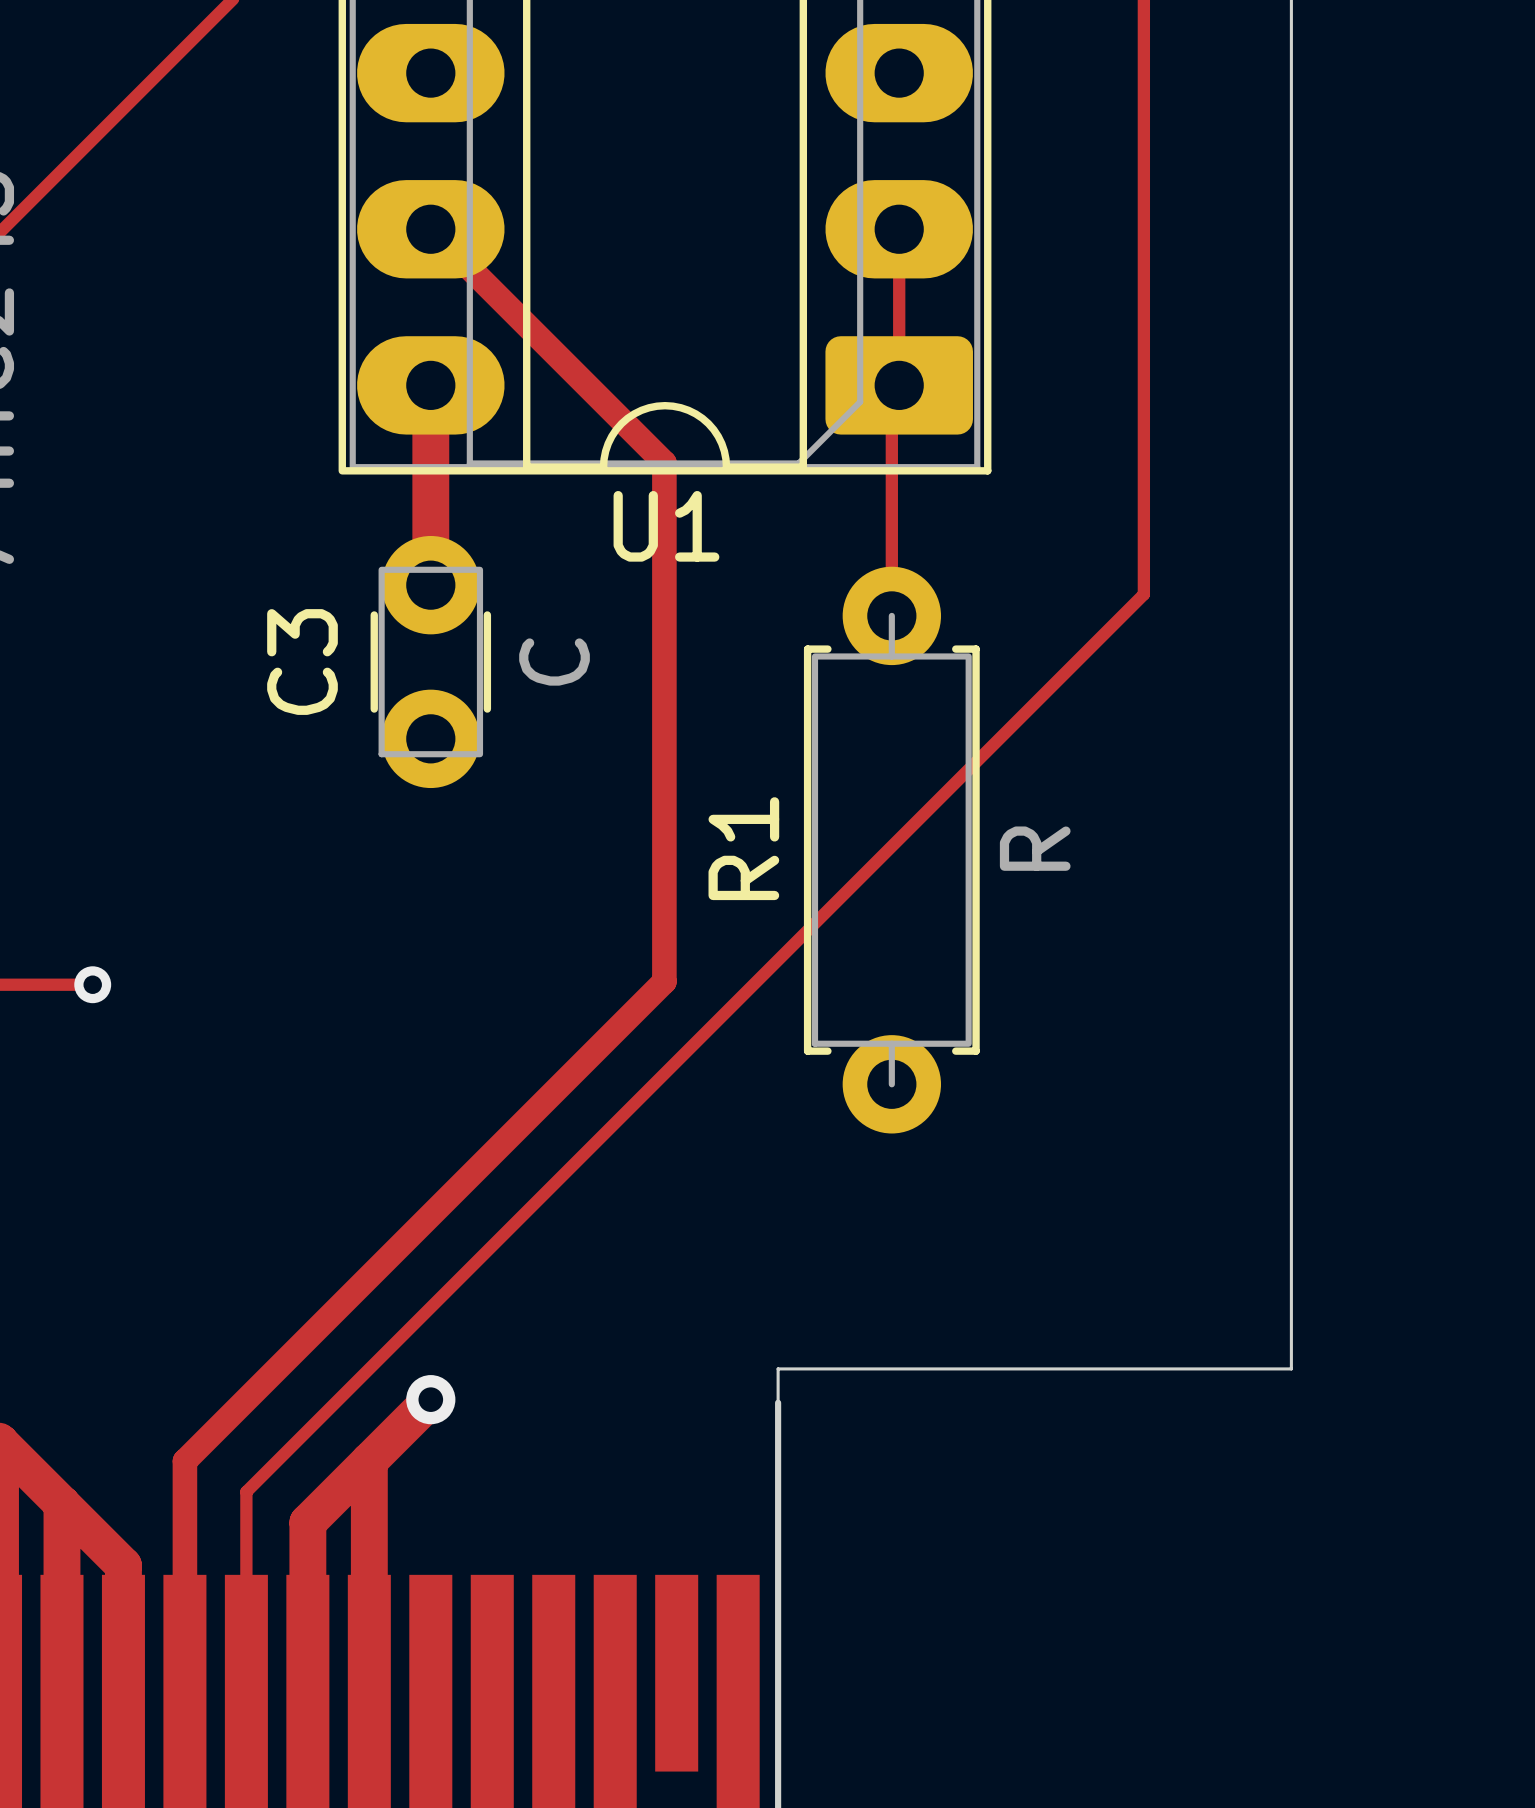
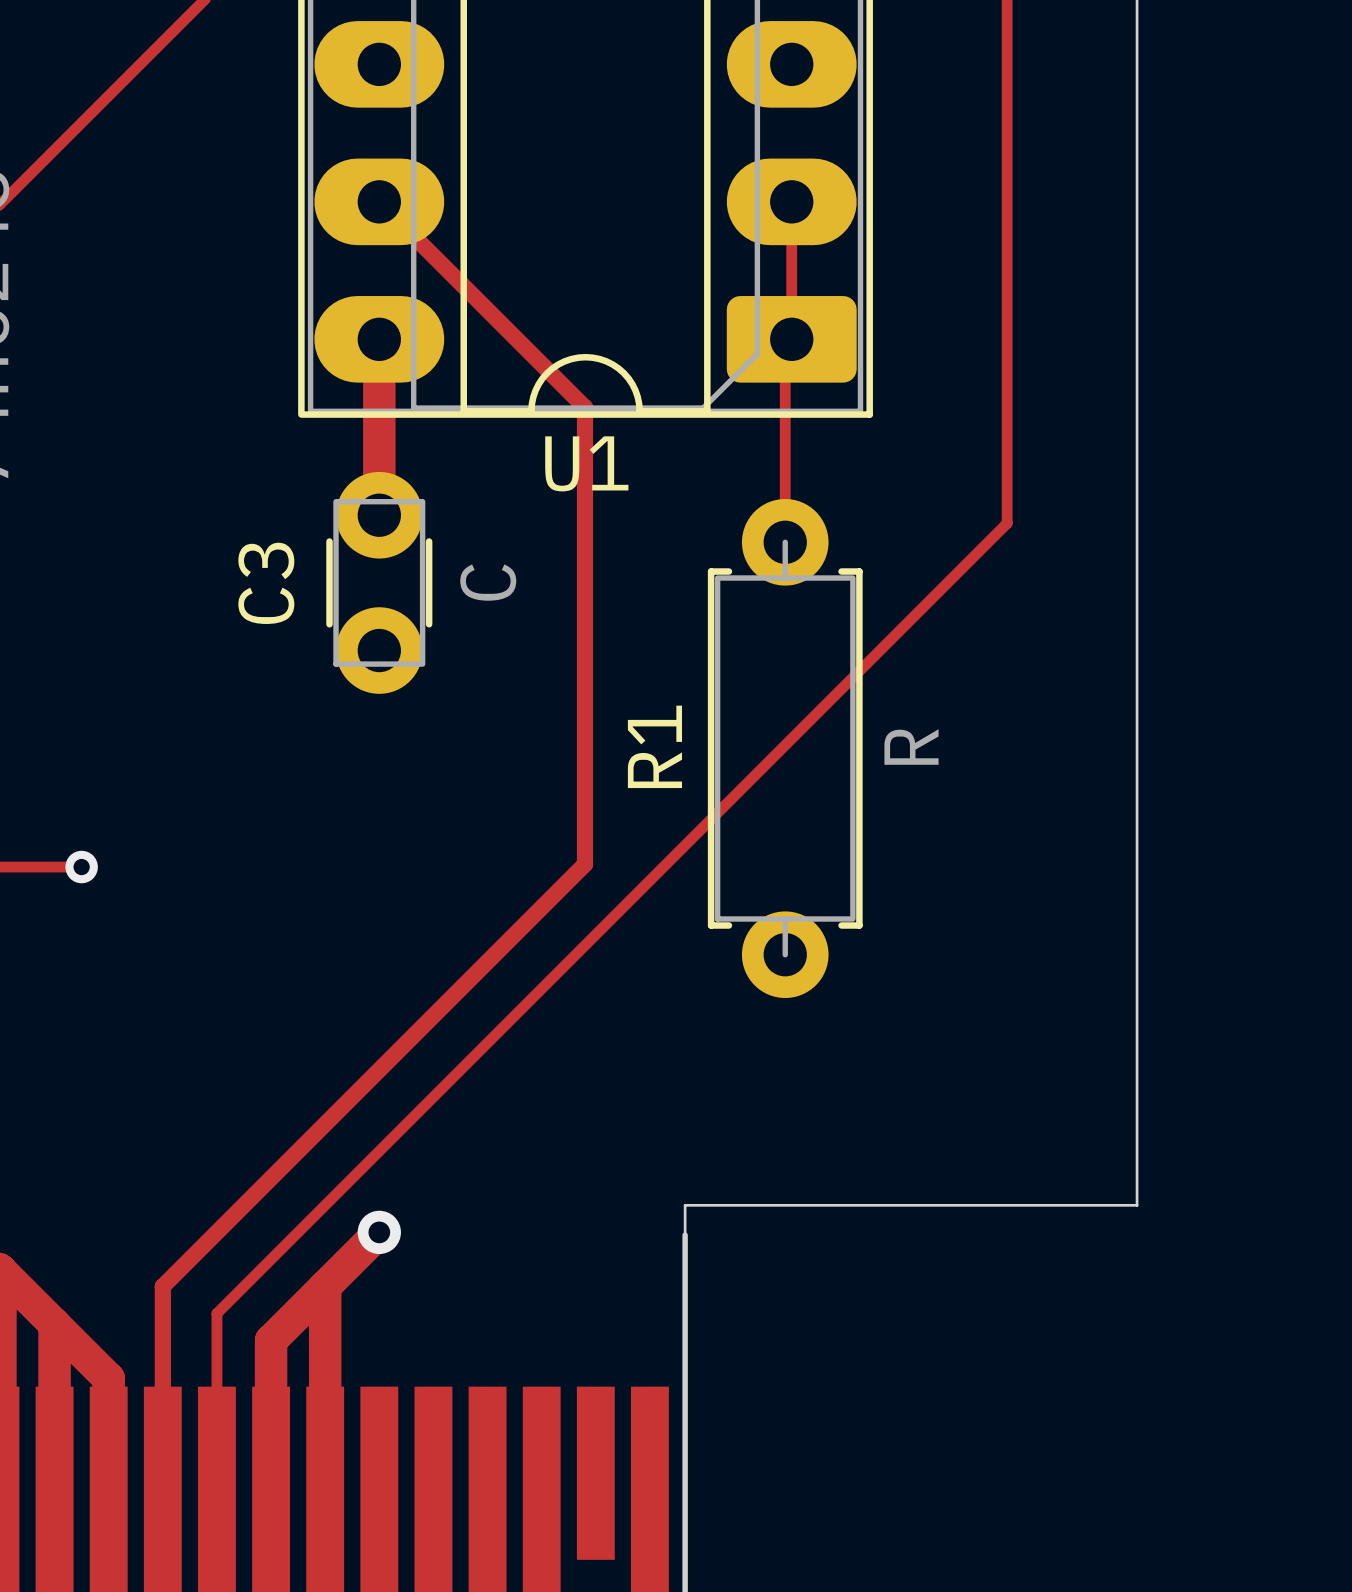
track width: thick (430, 229) (664, 462) (664, 981) (184, 1461) (184, 1707) -> thin (379, 201) (584, 407) (584, 864) (162, 1286) (162, 1503)

